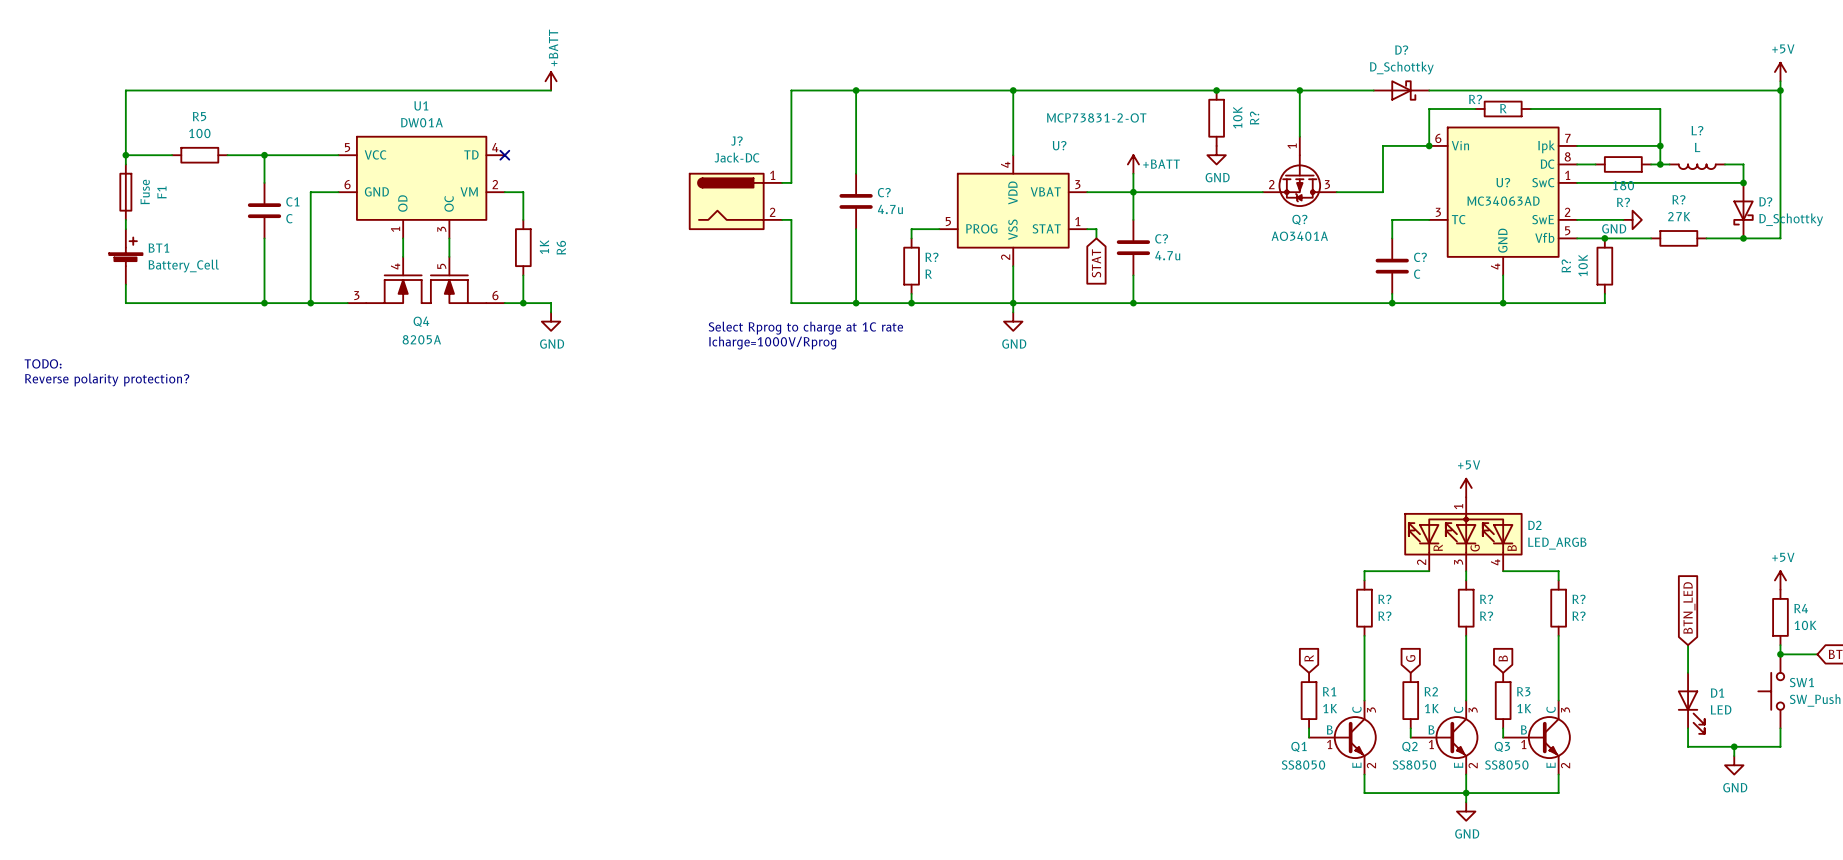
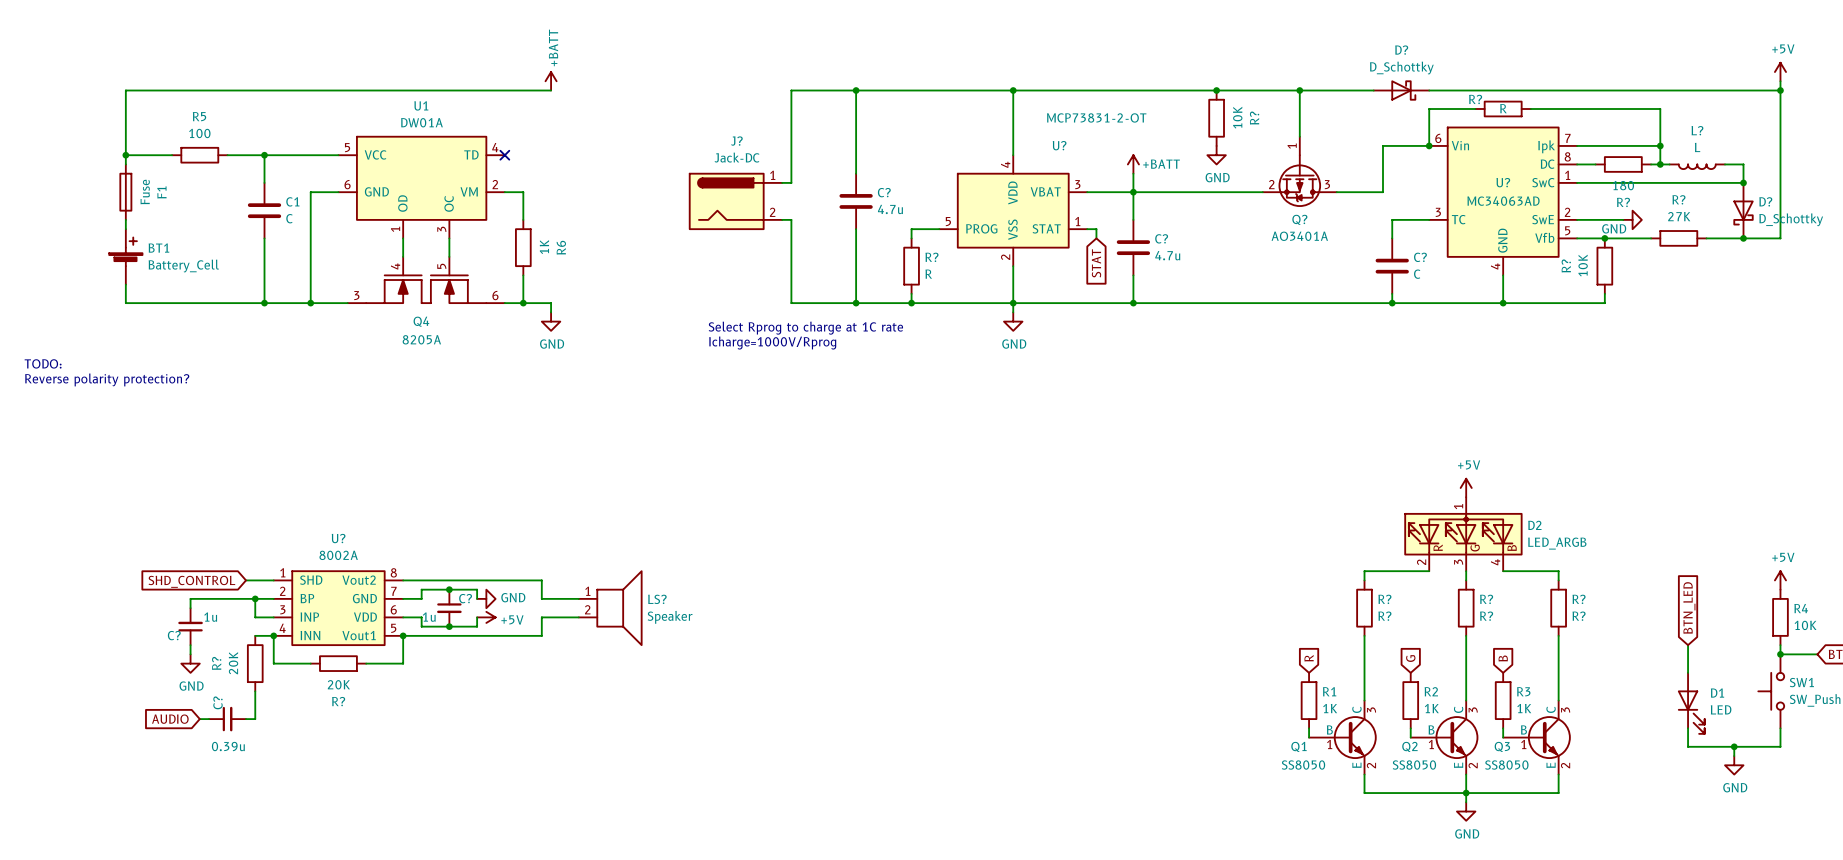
wire: none -> (246, 580) (273, 580)
wire: none -> (403, 580) (541, 580) (541, 598) (578, 598)
global label: none -> SHD_CONTROL (191, 581)
junction: none -> (449, 589)
wire: none -> (255, 598) (255, 617) (273, 617)
junction: none -> (255, 598)
wire: none -> (273, 598) (190, 598) (190, 608)
wire: none -> (403, 598) (421, 598) (421, 589) (477, 589) (477, 598)
power symbol: none -> GND (486, 598)
U?: none -> 8002A (338, 608)
C?: none -> 1u (449, 608)
LS?: none -> Speaker (610, 608)
wire: none -> (403, 617) (421, 617) (421, 626) (477, 626) (477, 617)
power symbol: none -> +5V (486, 617)
wire: none -> (578, 617) (541, 617) (541, 635) (403, 635) (403, 663) (366, 663)
C?: none -> 1u (190, 626)
junction: none -> (449, 626)
wire: none -> (255, 635) (273, 635) (273, 663) (310, 663)
junction: none -> (273, 635)
junction: none -> (403, 635)
wire: none -> (190, 645) (190, 654)
power symbol: none -> GND (190, 663)
R?: none -> 20K (255, 663)
R?: none -> 20K (338, 663)
wire: none -> (255, 691) (255, 719) (246, 719)
global label: none -> AUDIO (170, 719)
wire: none -> (199, 719) (209, 719)
C?: none -> 0.39u (227, 719)

